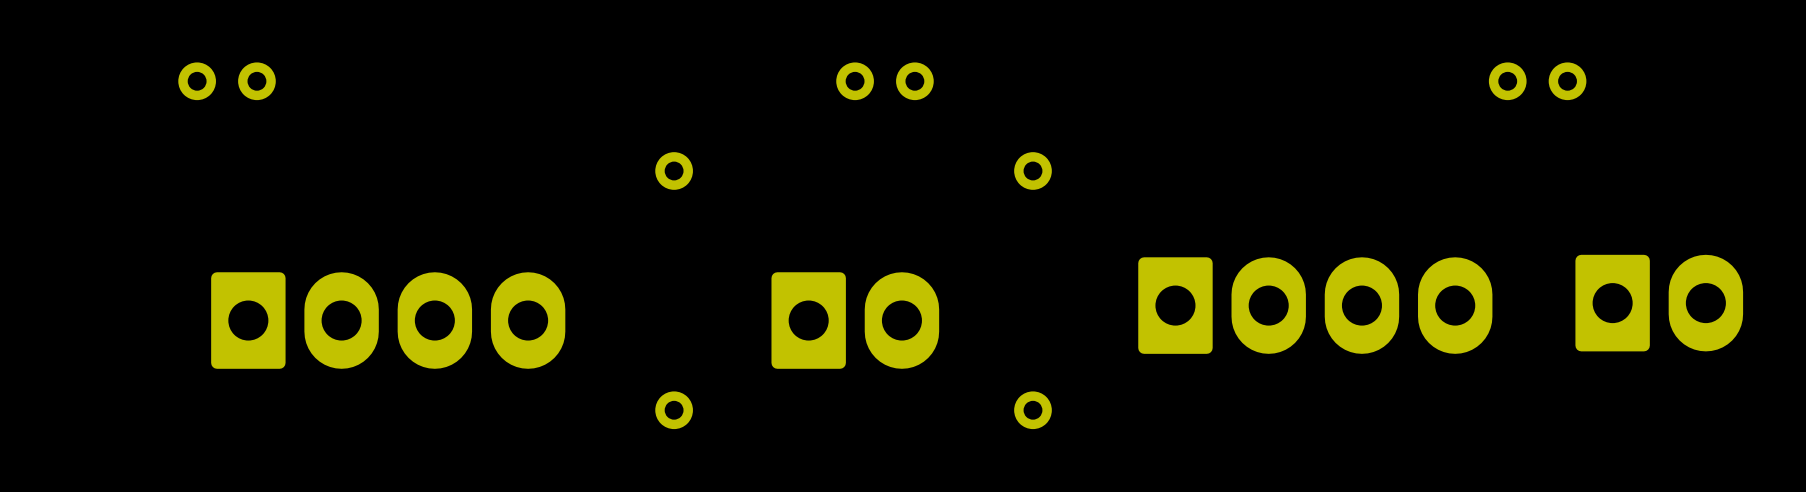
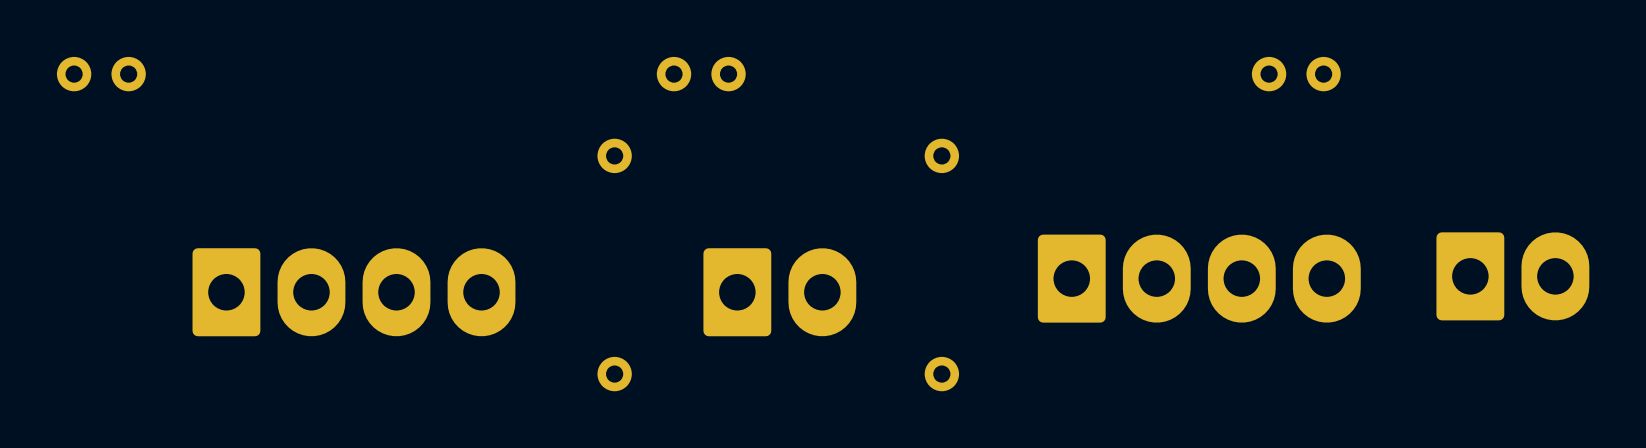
part position: (227, 81) -> (101, 74)
part position: (884, 81) -> (701, 74)
part position: (1537, 81) -> (1296, 74)

